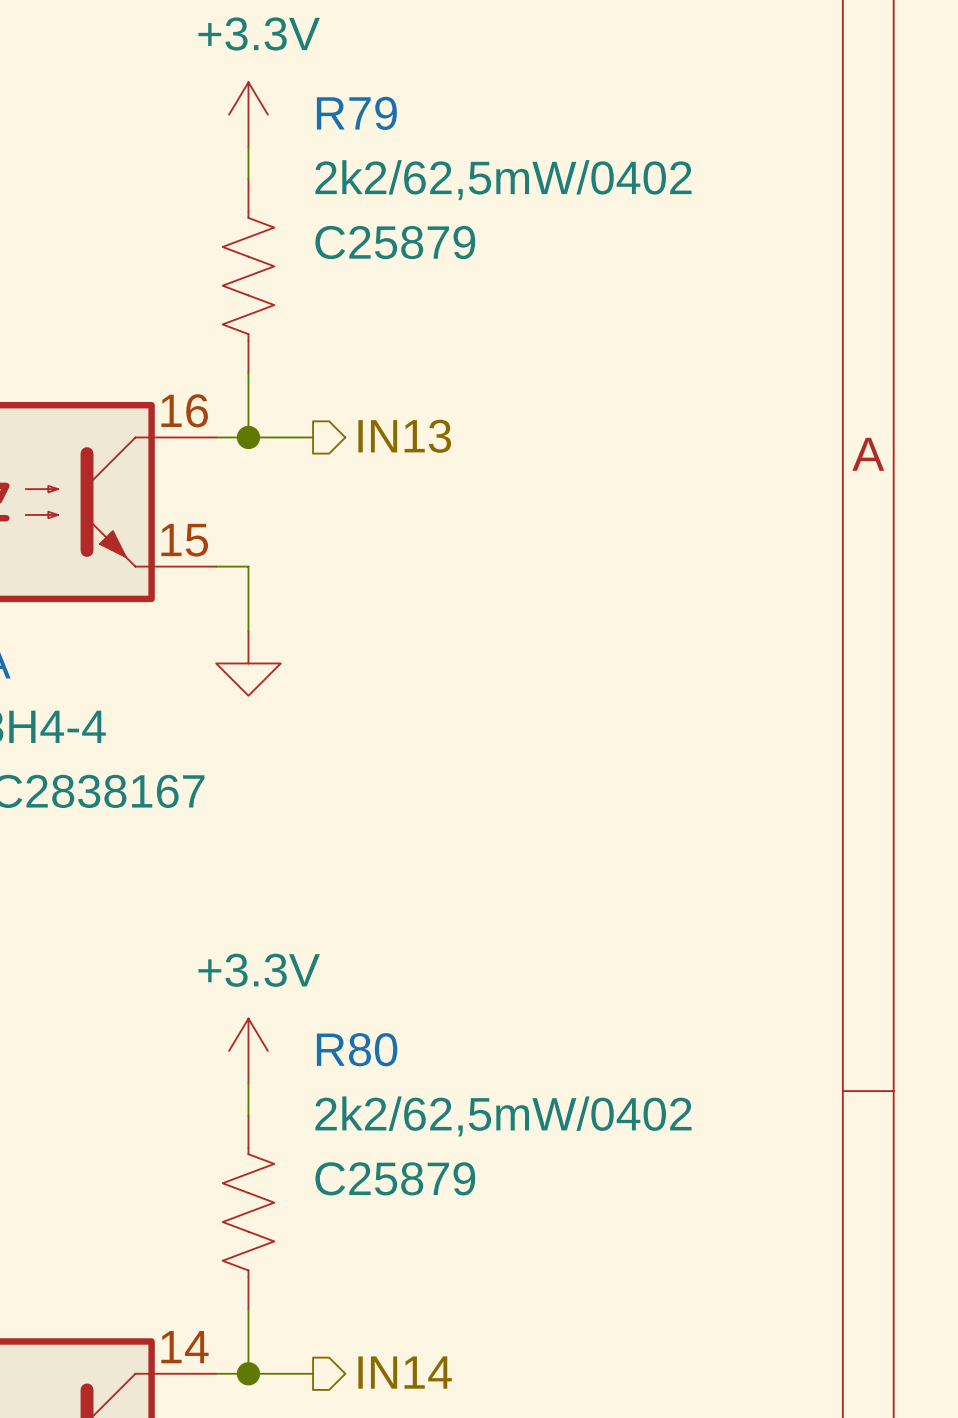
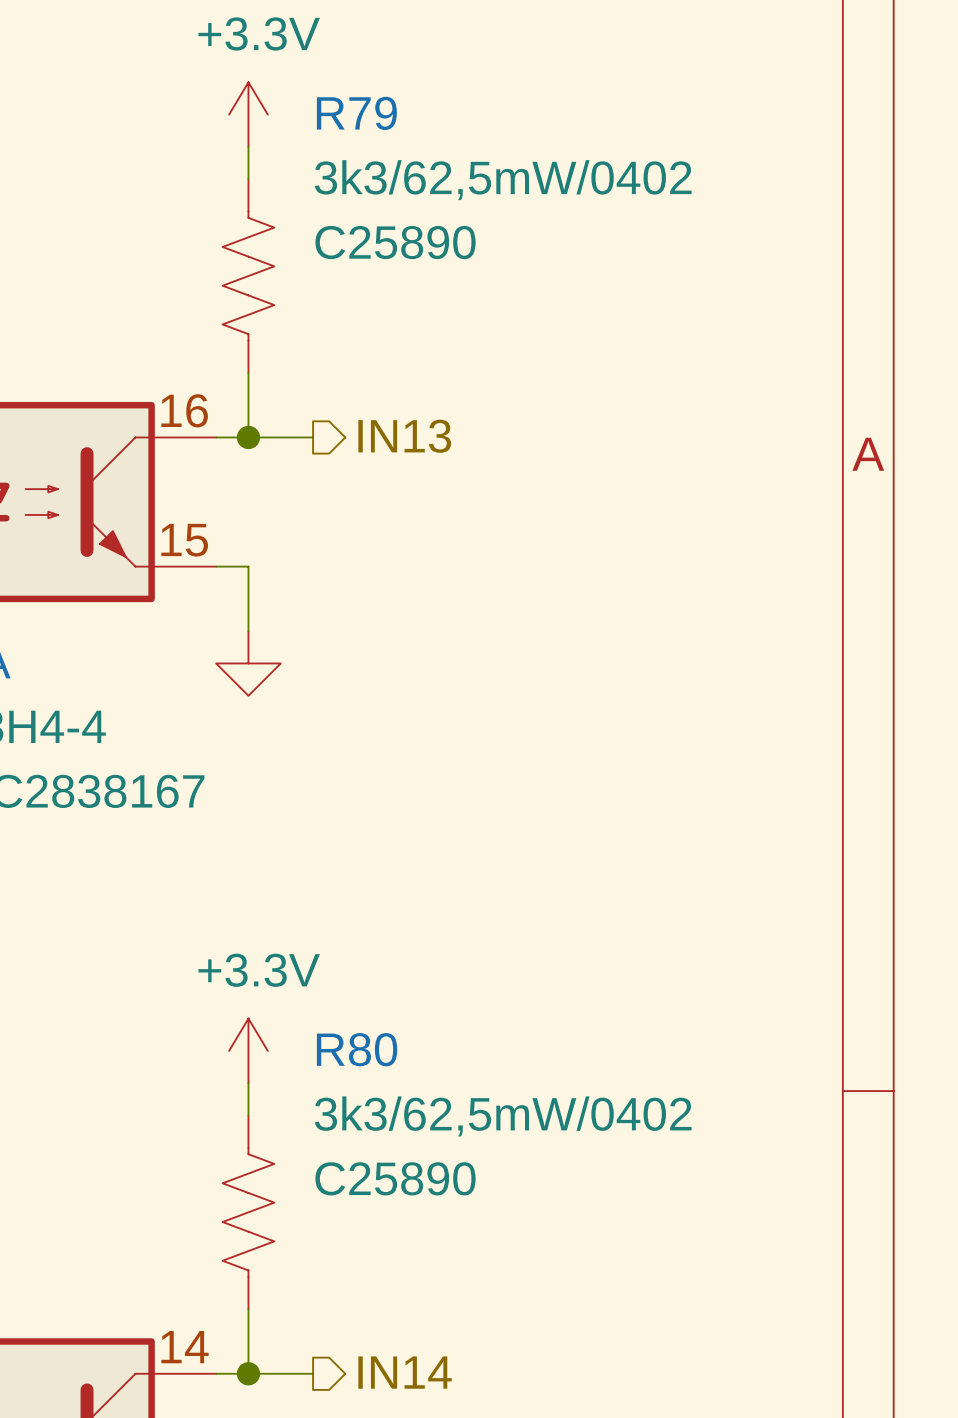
R79 value: 2k2/62,5mW/0402 (503, 180) -> 3k3/62,5mW/0402 (503, 180)
R79 text: C25879 (395, 242) -> C25890 (395, 242)
R80 value: 2k2/62,5mW/0402 (503, 1116) -> 3k3/62,5mW/0402 (503, 1116)
R80 text: C25879 (395, 1178) -> C25890 (395, 1178)

